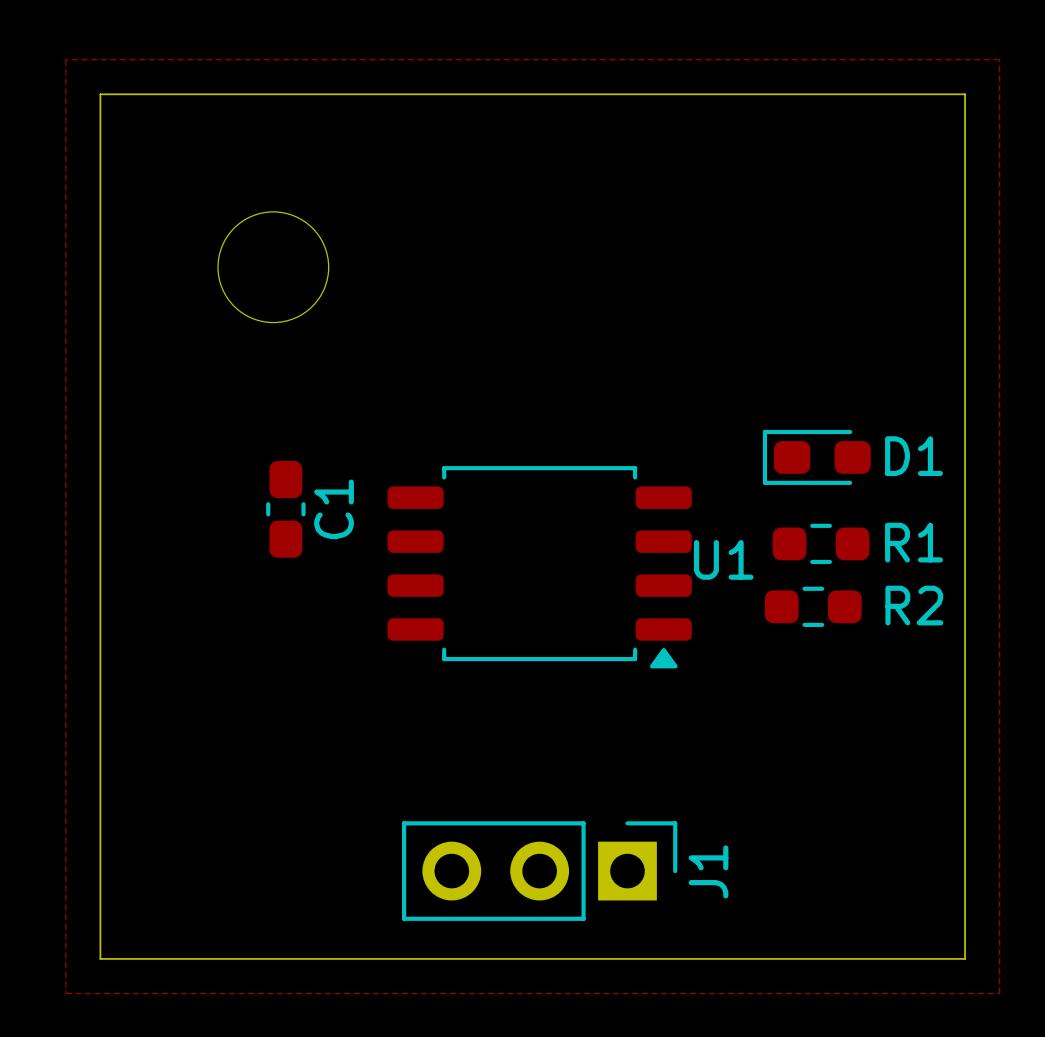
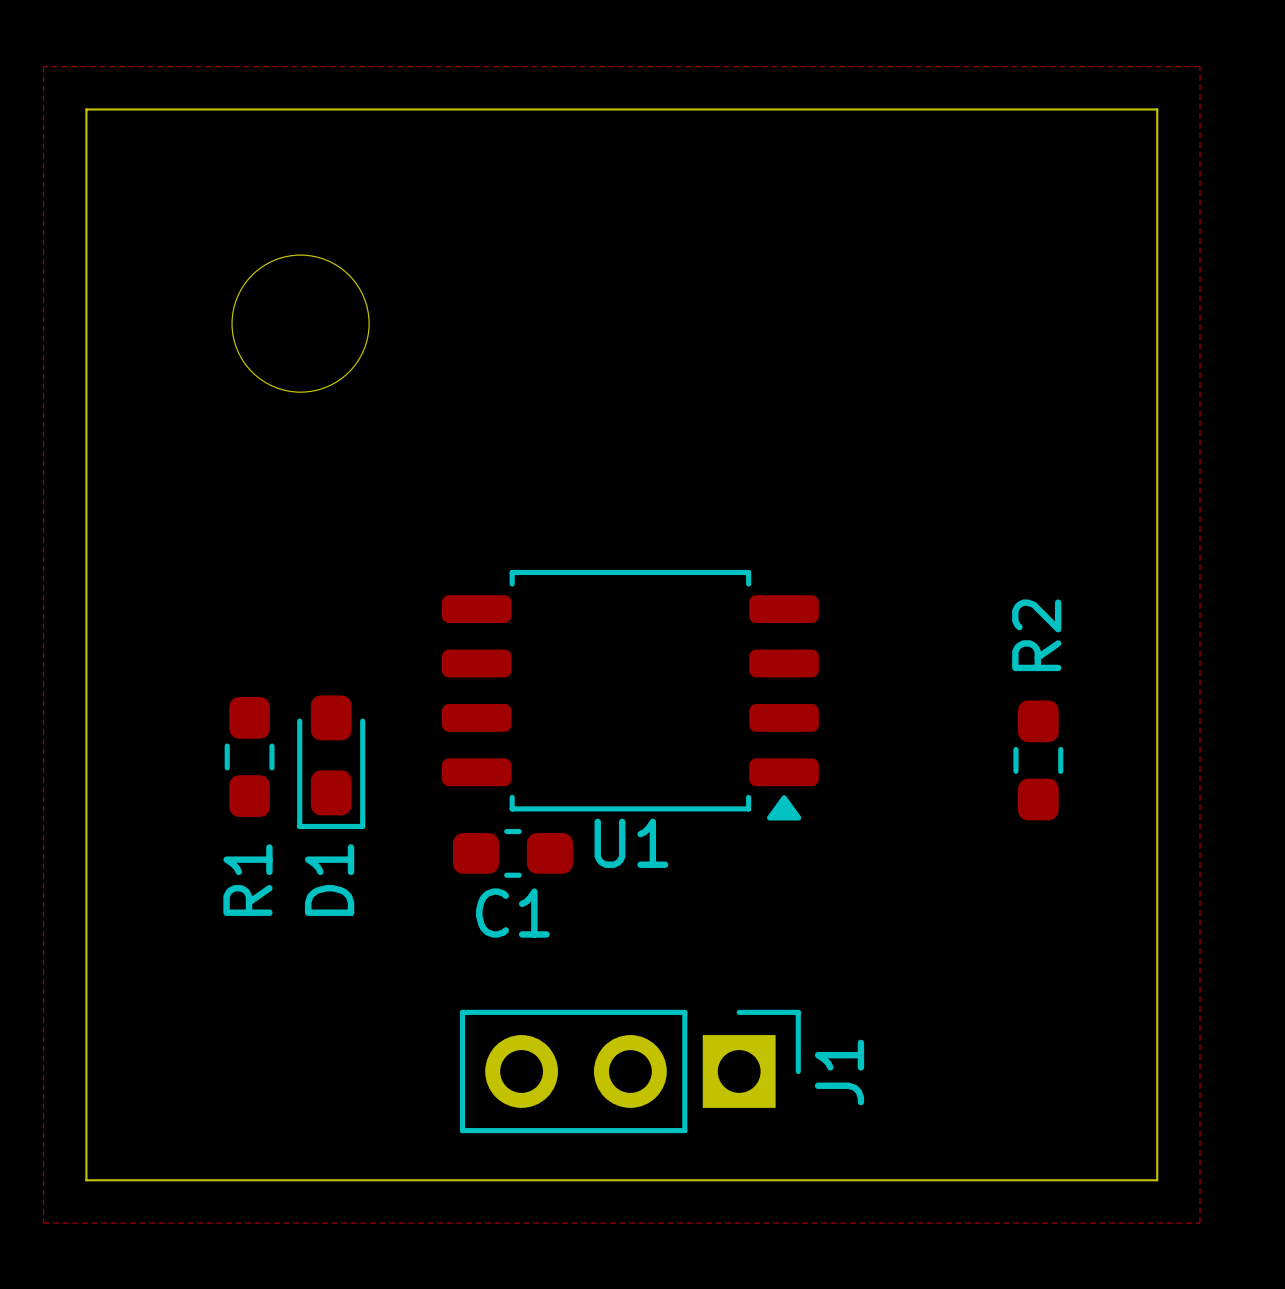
D1 name position: D1 (913, 456) -> D1 (329, 880)
D1 rotation: 0° (816, 457) -> 90° counterclockwise (331, 762)
D1 position: (816, 457) -> (331, 762)
C1 rotation: 0° (285, 509) -> 90° clockwise (512, 853)
C1 position: (285, 509) -> (512, 853)
R1 rotation: 0° (821, 543) -> 90° clockwise (249, 756)
R1 position: (821, 543) -> (249, 756)
U1 name position: U1 (723, 559) -> U1 (631, 843)
R2 name position: R2 (914, 605) -> R2 (1036, 635)
R2 rotation: 0° (813, 606) -> 90° clockwise (1038, 760)

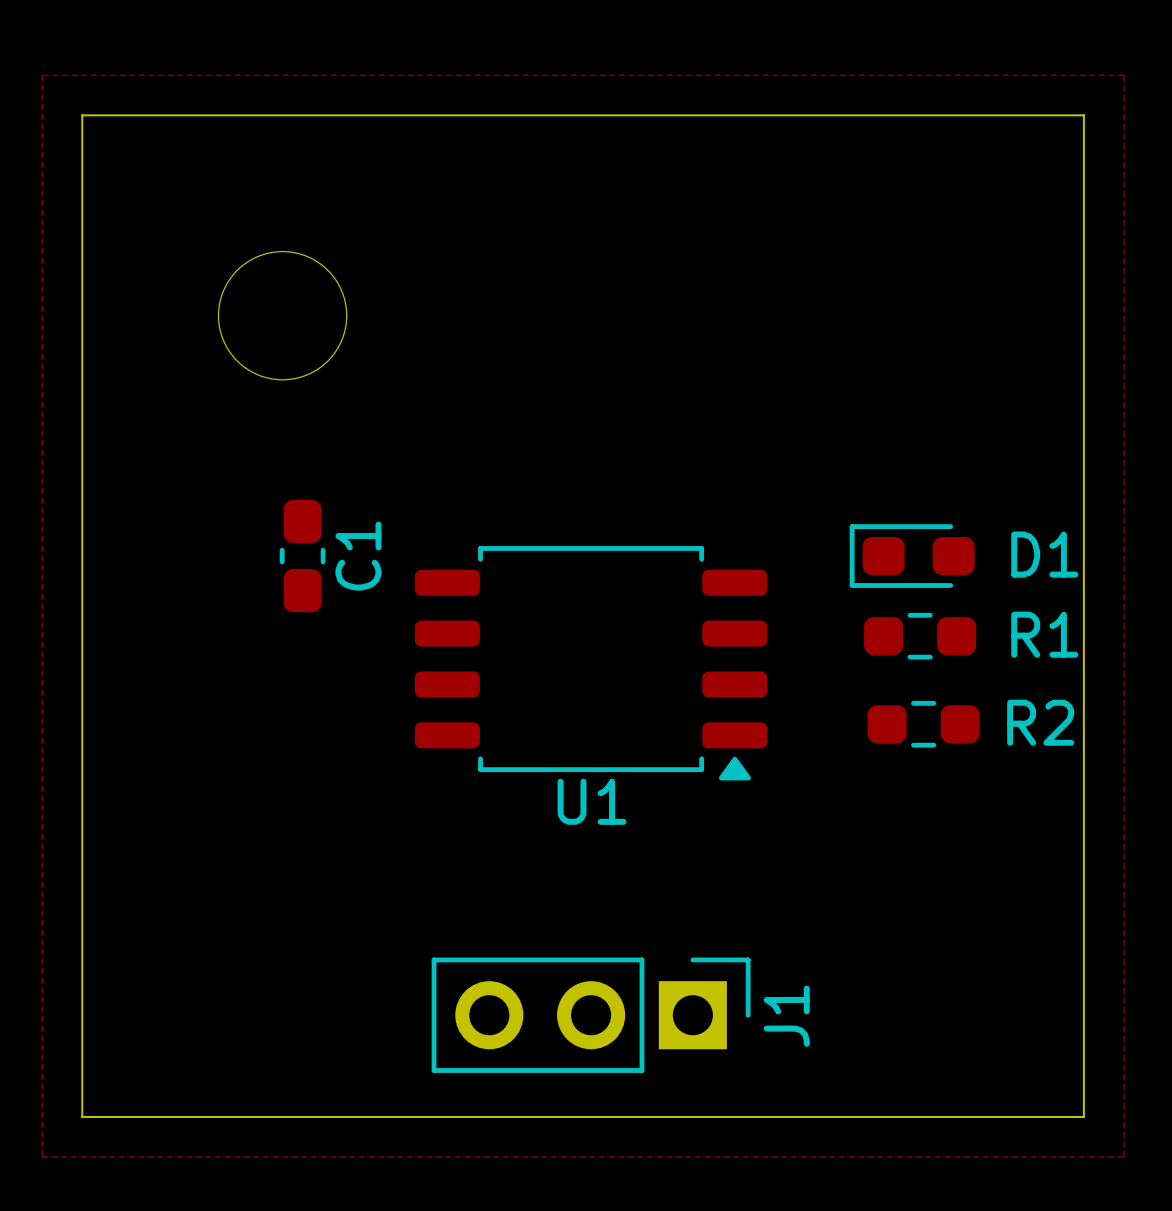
R1 rotation: 0° (249, 756) -> 90° clockwise (920, 636)
R1 position: (249, 756) -> (920, 636)
R2 rotation: 0° (1038, 760) -> 90° clockwise (923, 724)
D1 rotation: 0° (331, 762) -> 90° clockwise (912, 556)
D1 position: (331, 762) -> (912, 556)
C1 rotation: 0° (512, 853) -> 90° clockwise (302, 556)
C1 position: (512, 853) -> (302, 556)
R1 name position: R1 (248, 880) -> R1 (1044, 634)
D1 name position: D1 (329, 880) -> D1 (1044, 554)
C1 name position: C1 (512, 913) -> C1 (358, 556)

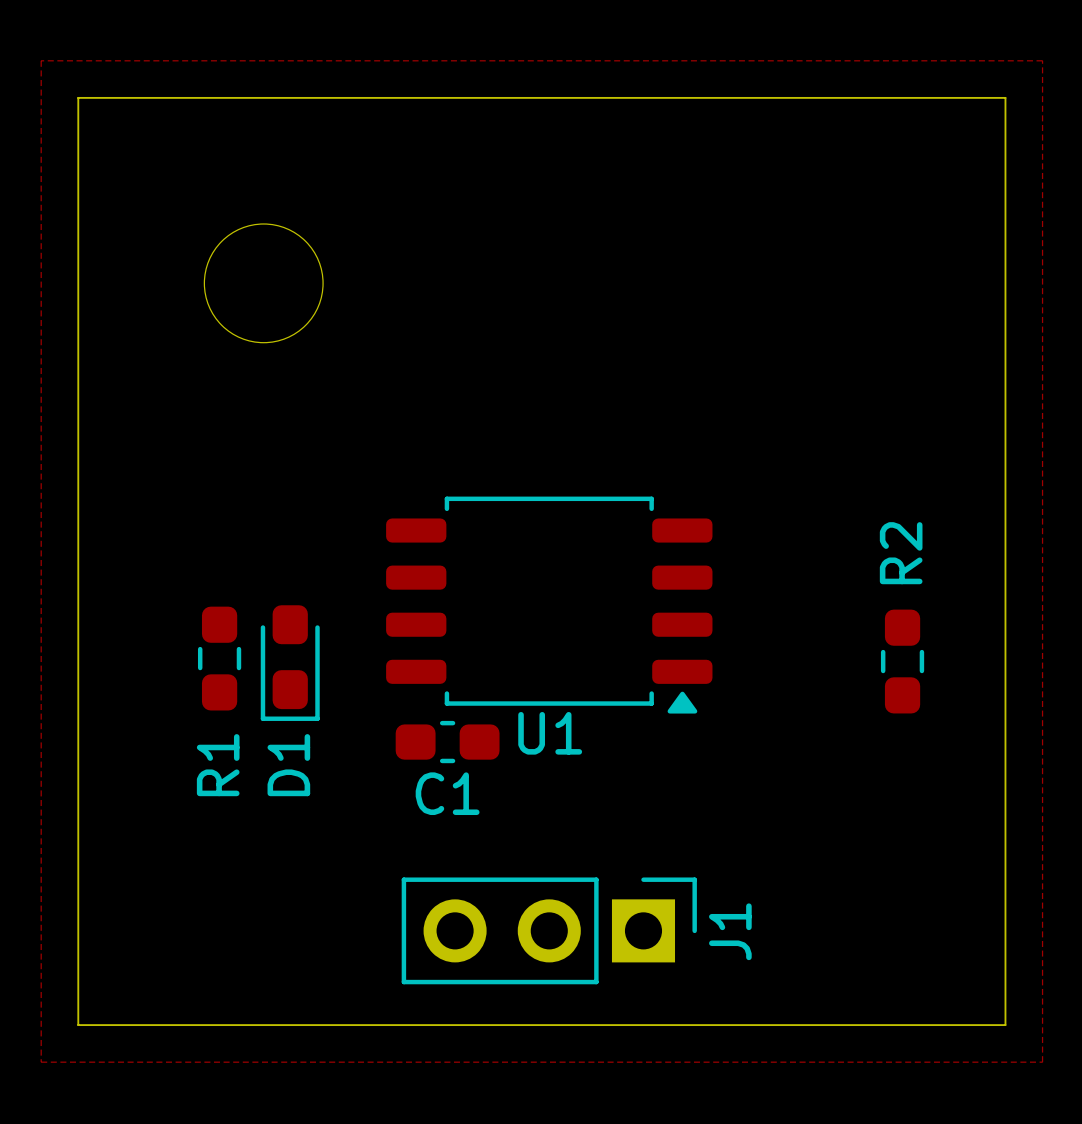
D1 name position: D1 (1044, 554) -> D1 (288, 765)
C1 rotation: 0° (302, 556) -> 90° clockwise (447, 742)
C1 position: (302, 556) -> (447, 742)
D1 rotation: 0° (912, 556) -> 90° counterclockwise (290, 663)
D1 position: (912, 556) -> (290, 663)
R1 rotation: 0° (920, 636) -> 90° clockwise (219, 658)
R1 position: (920, 636) -> (219, 658)
R2 name position: R2 (1040, 722) -> R2 (901, 553)
R2 rotation: 0° (923, 724) -> 90° clockwise (902, 661)

